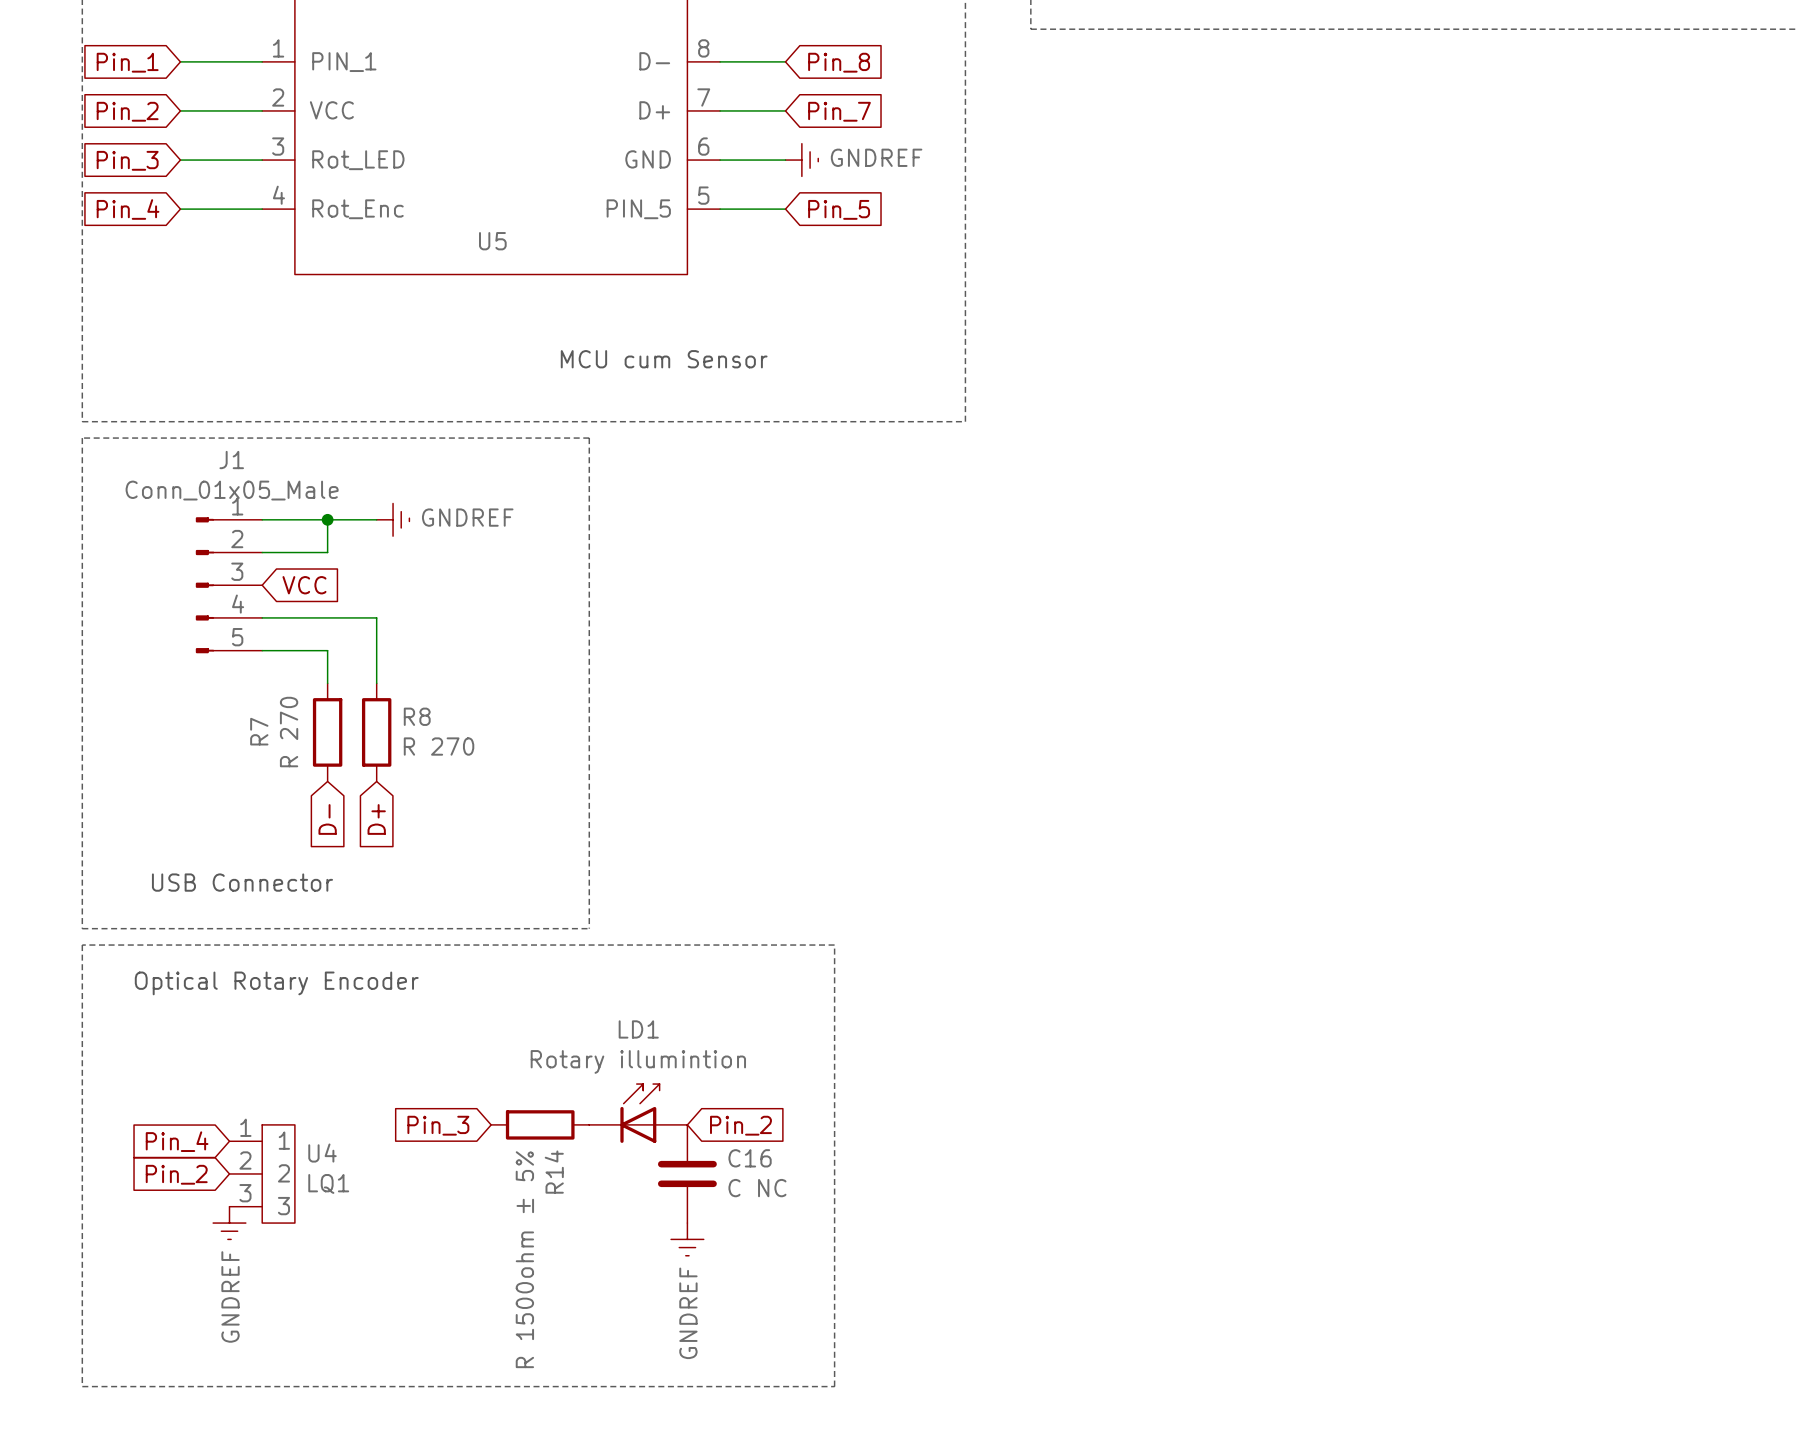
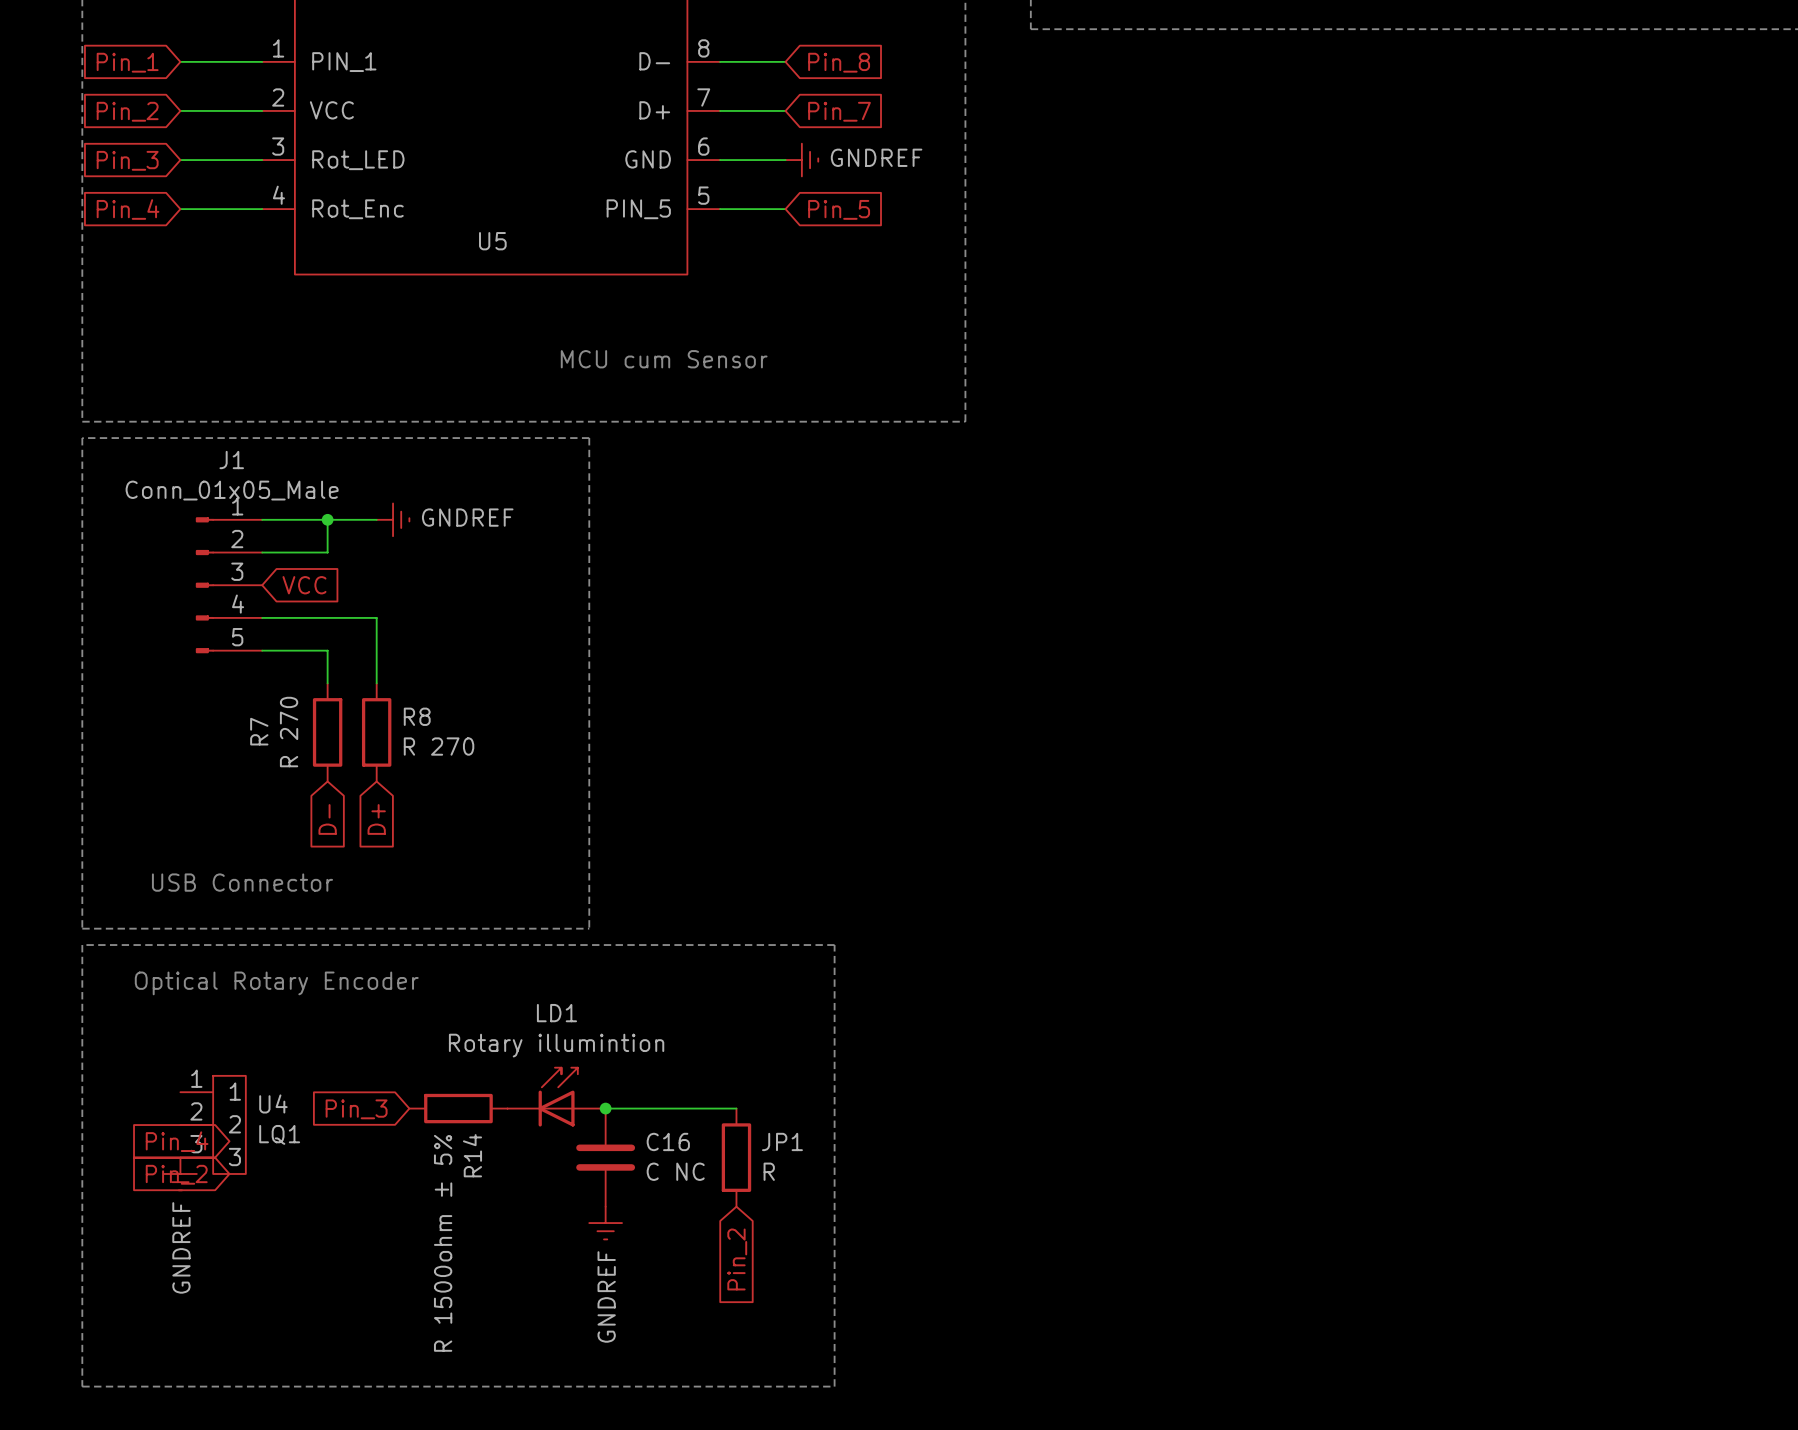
wire: none -> (605, 1108) (736, 1108)
junction: none -> (605, 1108)
LD1 position: (638, 1113) -> (556, 1097)
R14 position: (540, 1124) -> (458, 1108)
global label position: Pin_3 (438, 1125) -> Pin_3 (356, 1109)
global label rotation: 0° (740, 1125) -> 90° clockwise (737, 1259)
global label position: Pin_2 (740, 1125) -> Pin_2 (737, 1259)
JP1: none -> R (736, 1157)
U4 position: (262, 1173) -> (213, 1124)
C16 position: (687, 1173) -> (605, 1157)
power symbol position: GNDREF (229, 1223) -> GNDREF (180, 1173)
power symbol position: GNDREF (687, 1239) -> GNDREF (605, 1223)

